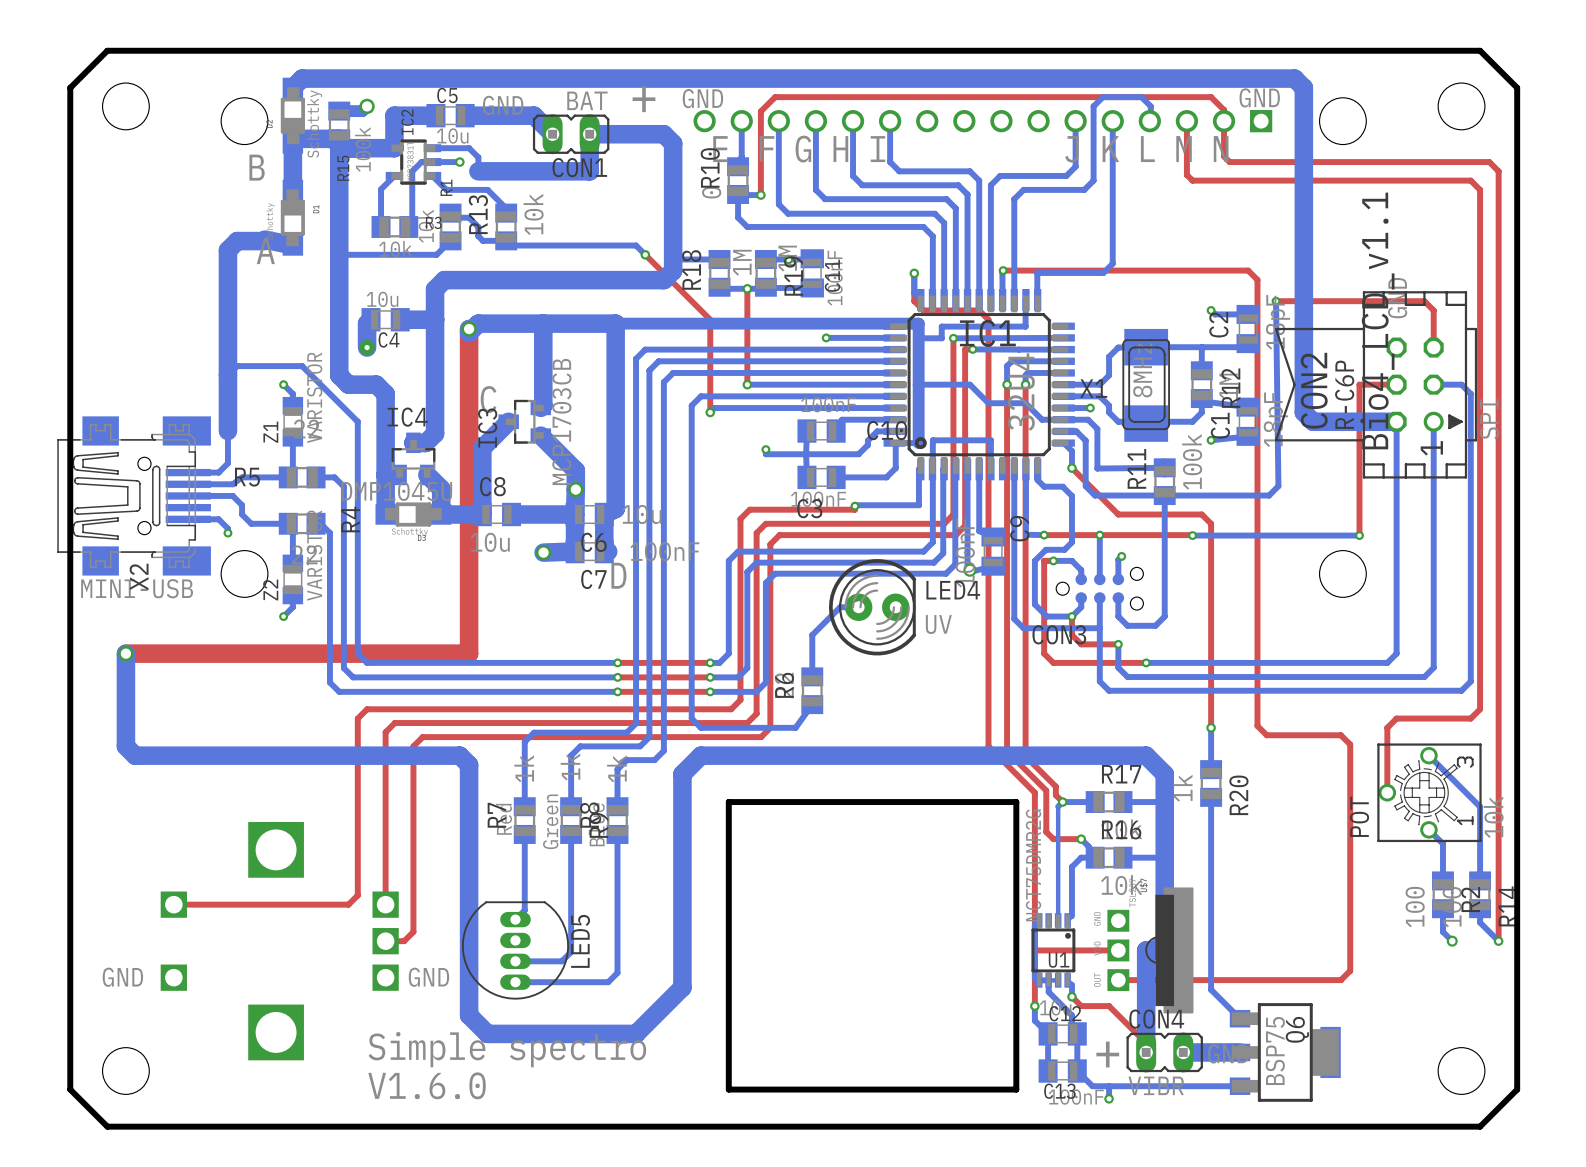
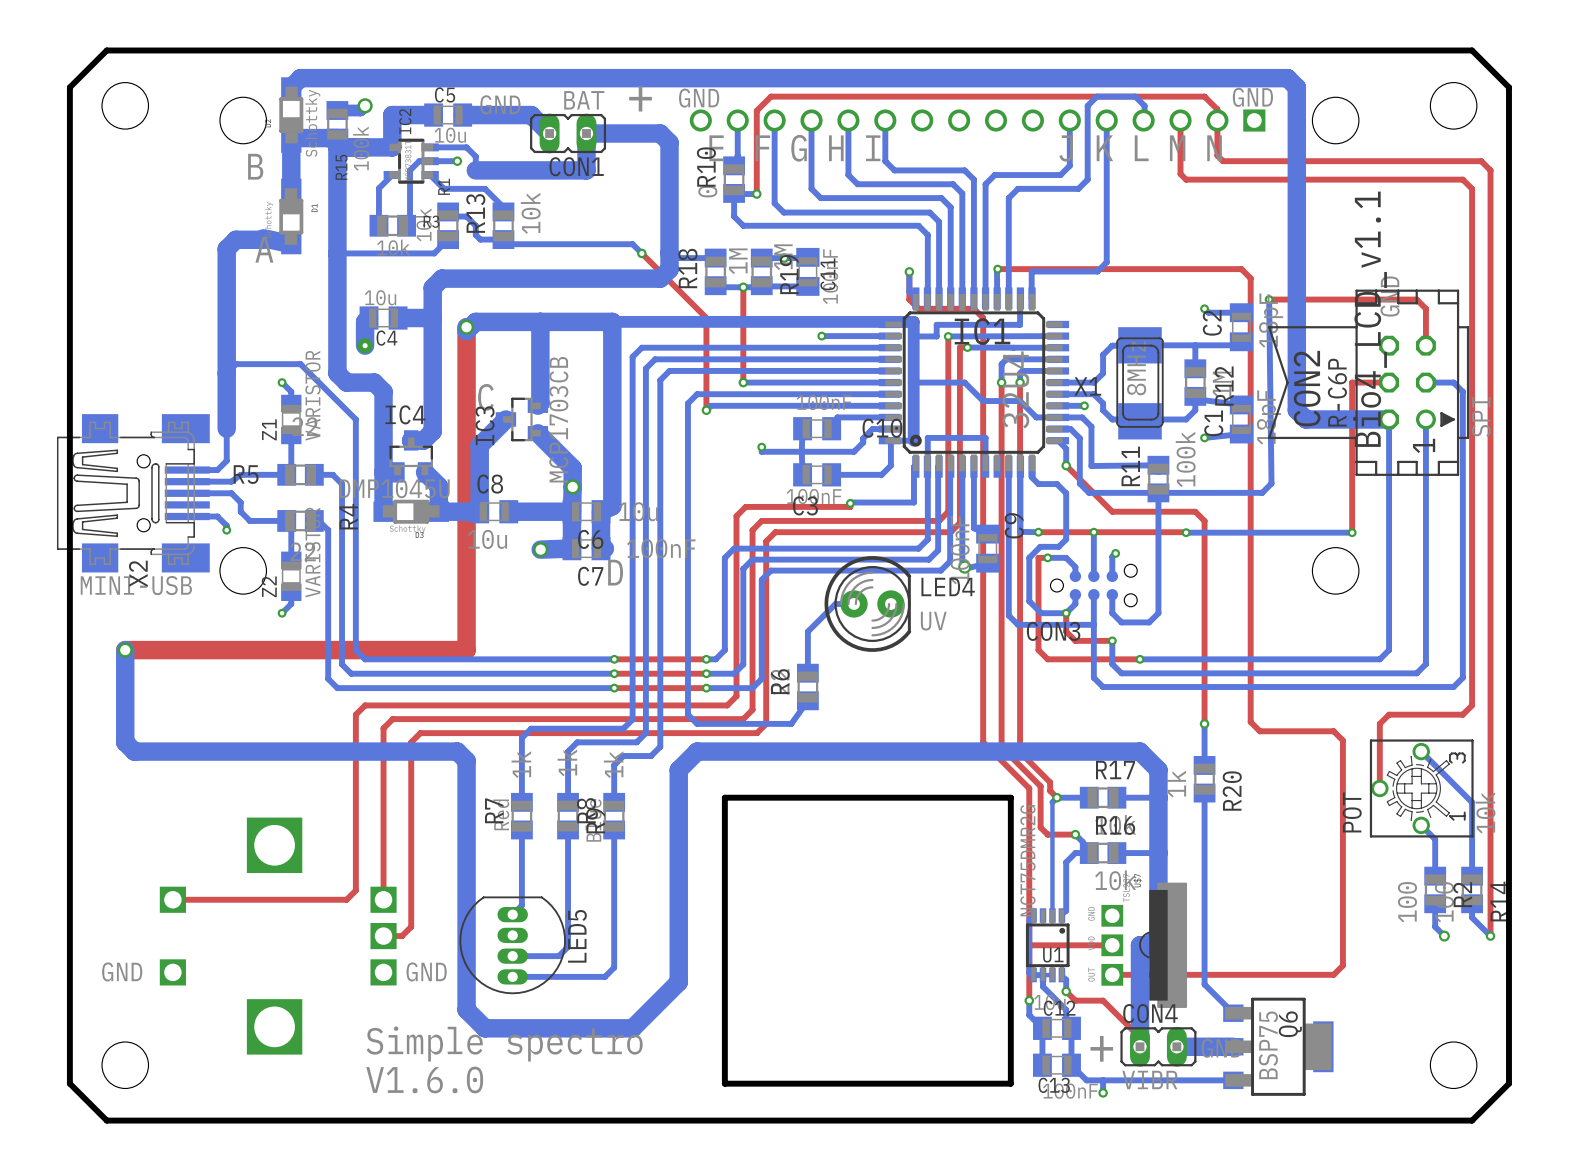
text: Green (550, 821) -> none

